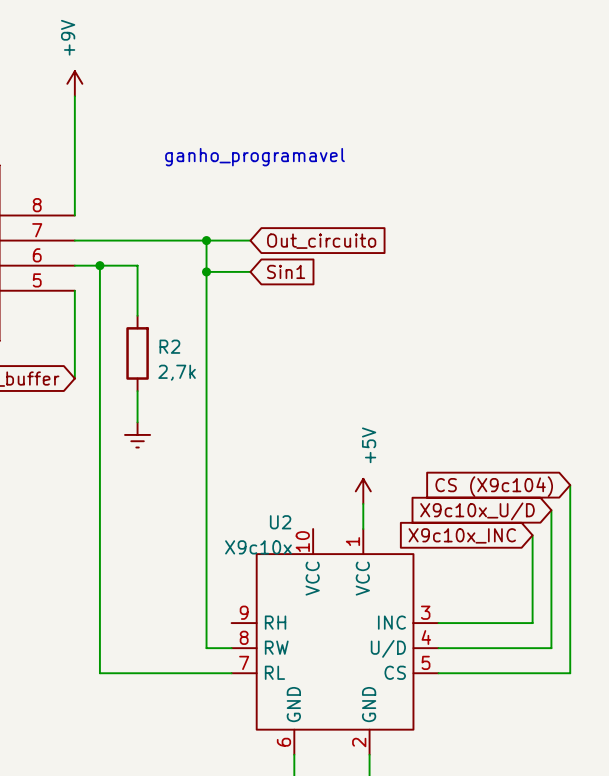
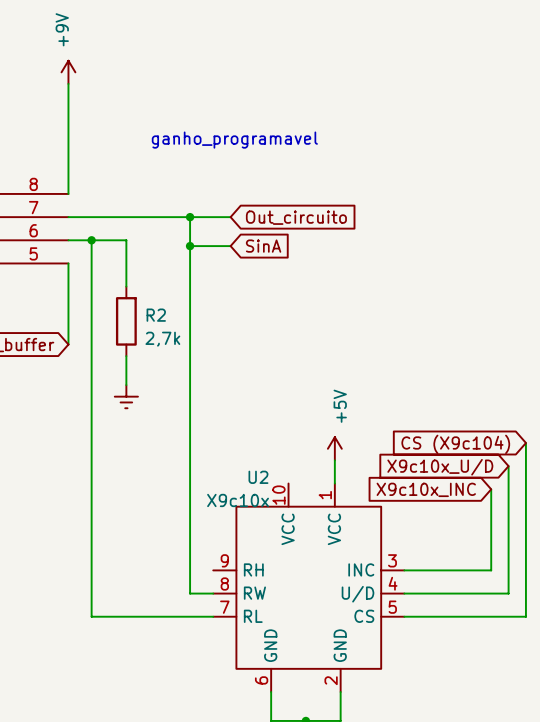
global label: Sin1 (286, 271) -> SinA (263, 246)

